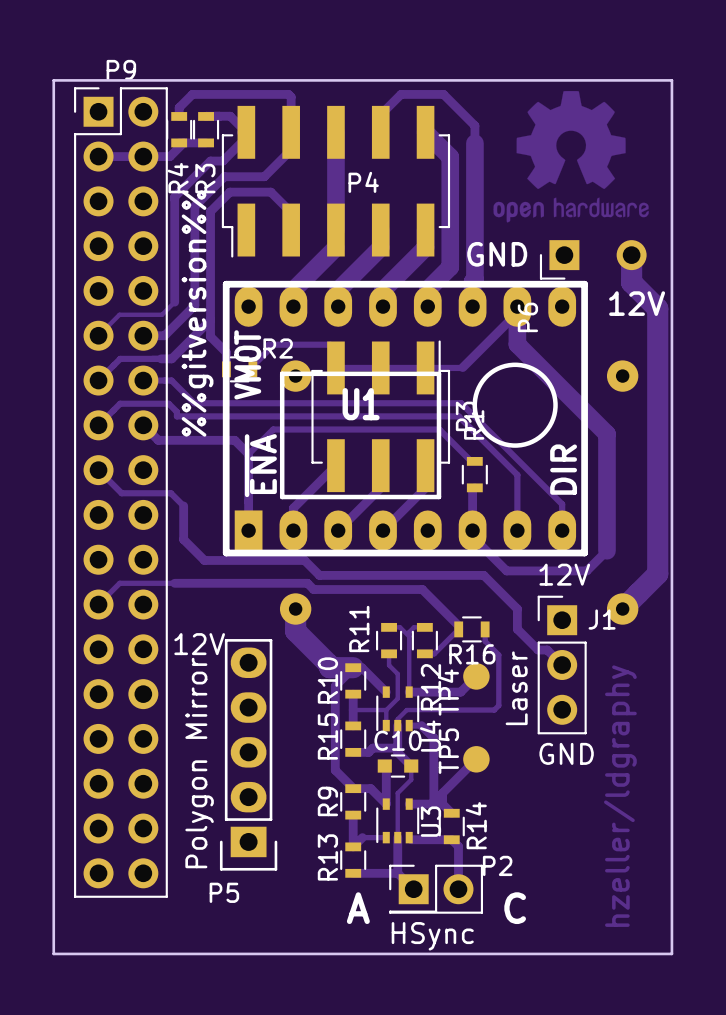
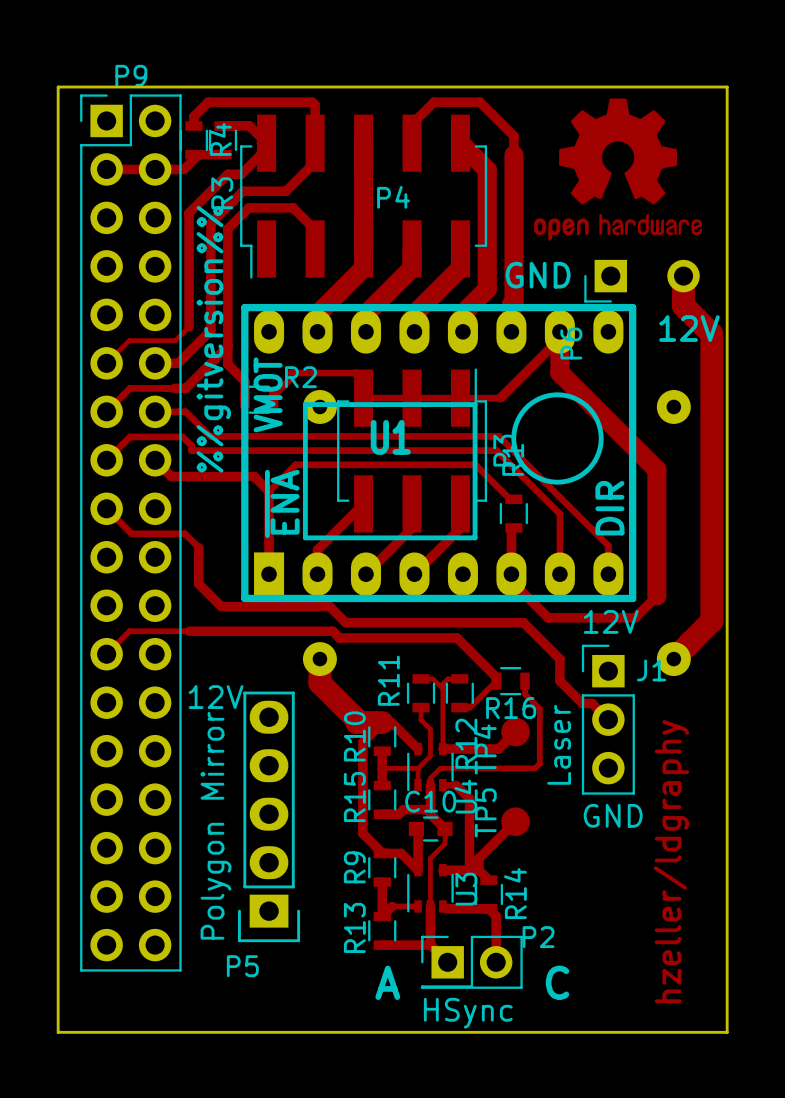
R4 name position: R4 (178, 178) -> R4 (220, 139)

